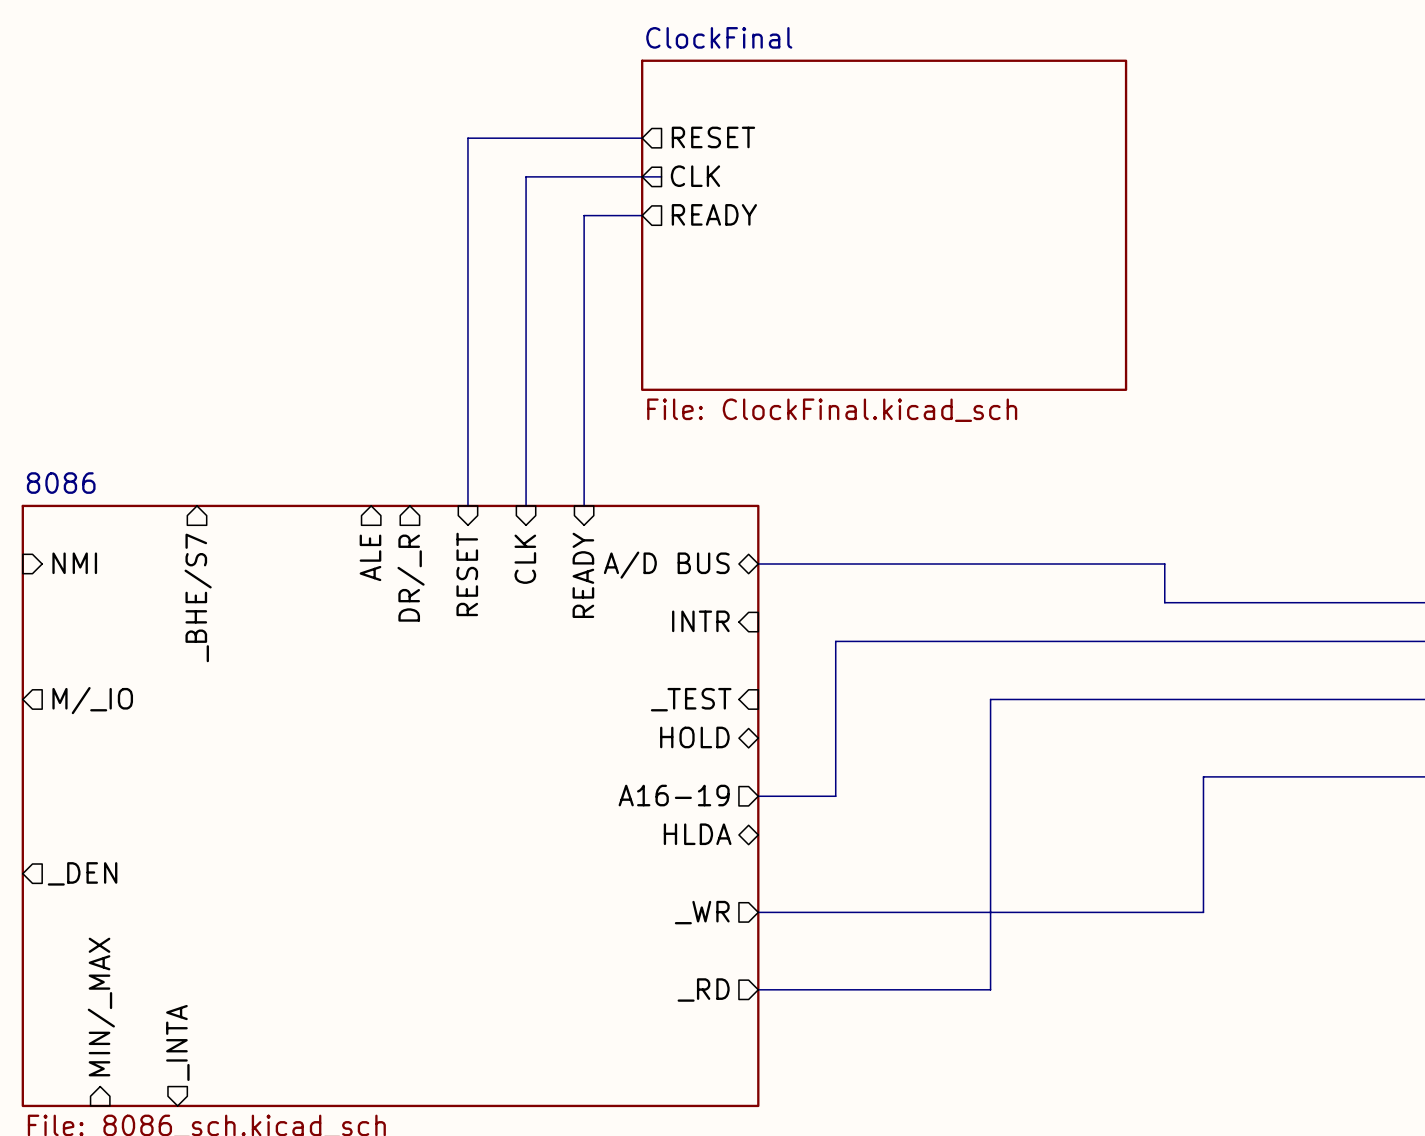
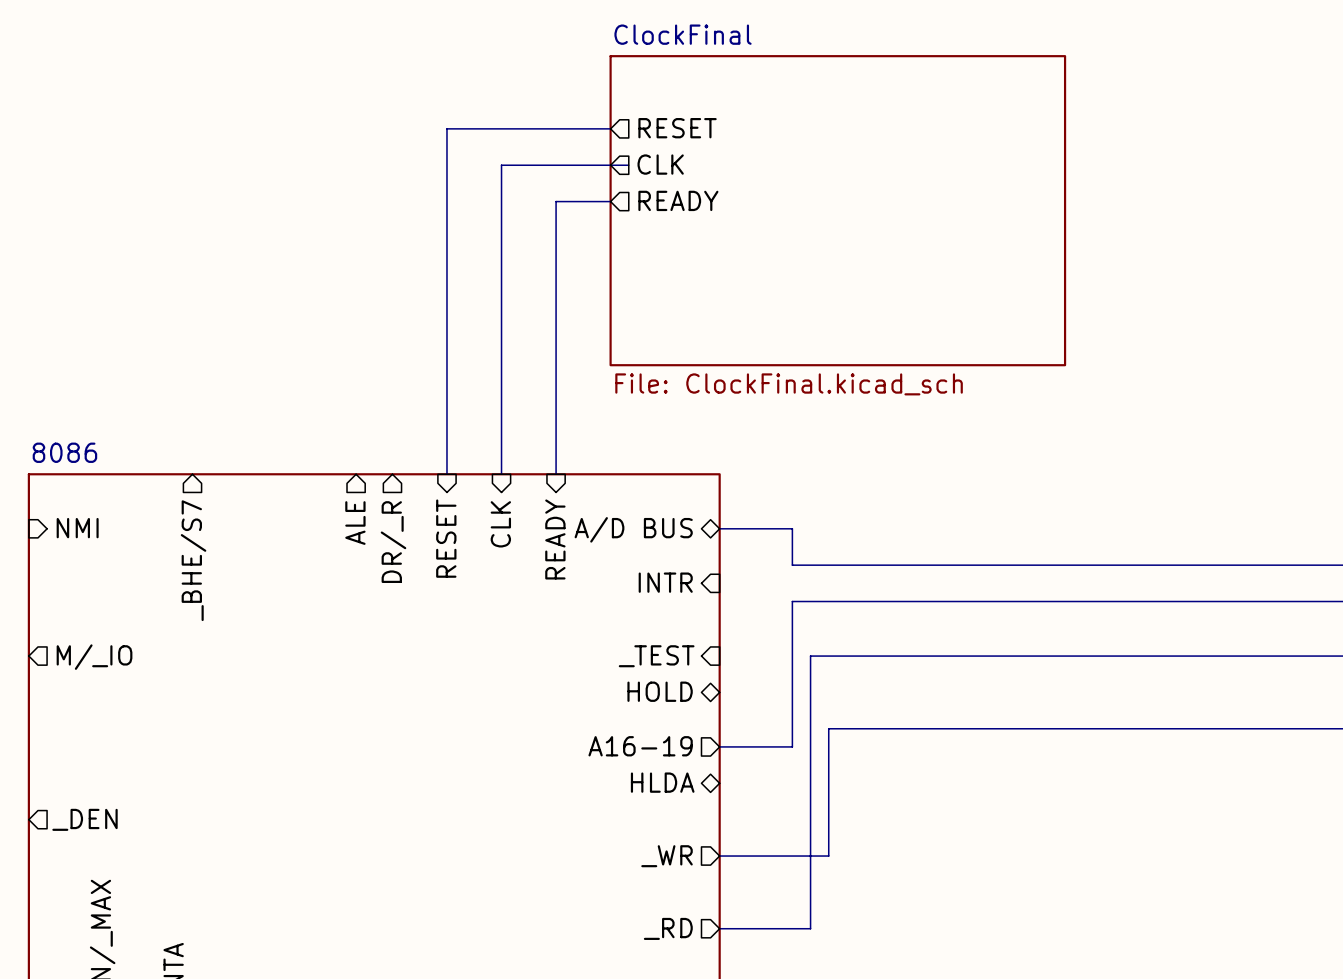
bus: (835, 563) (1164, 563) (1164, 602) -> (792, 528) (792, 565) (1101, 565)
wire: (990, 699) (990, 989) (855, 989) -> (937, 656) (810, 656) (810, 928)
wire: (1203, 776) (1203, 912) (874, 912) -> (1137, 728) (828, 728) (828, 856)

